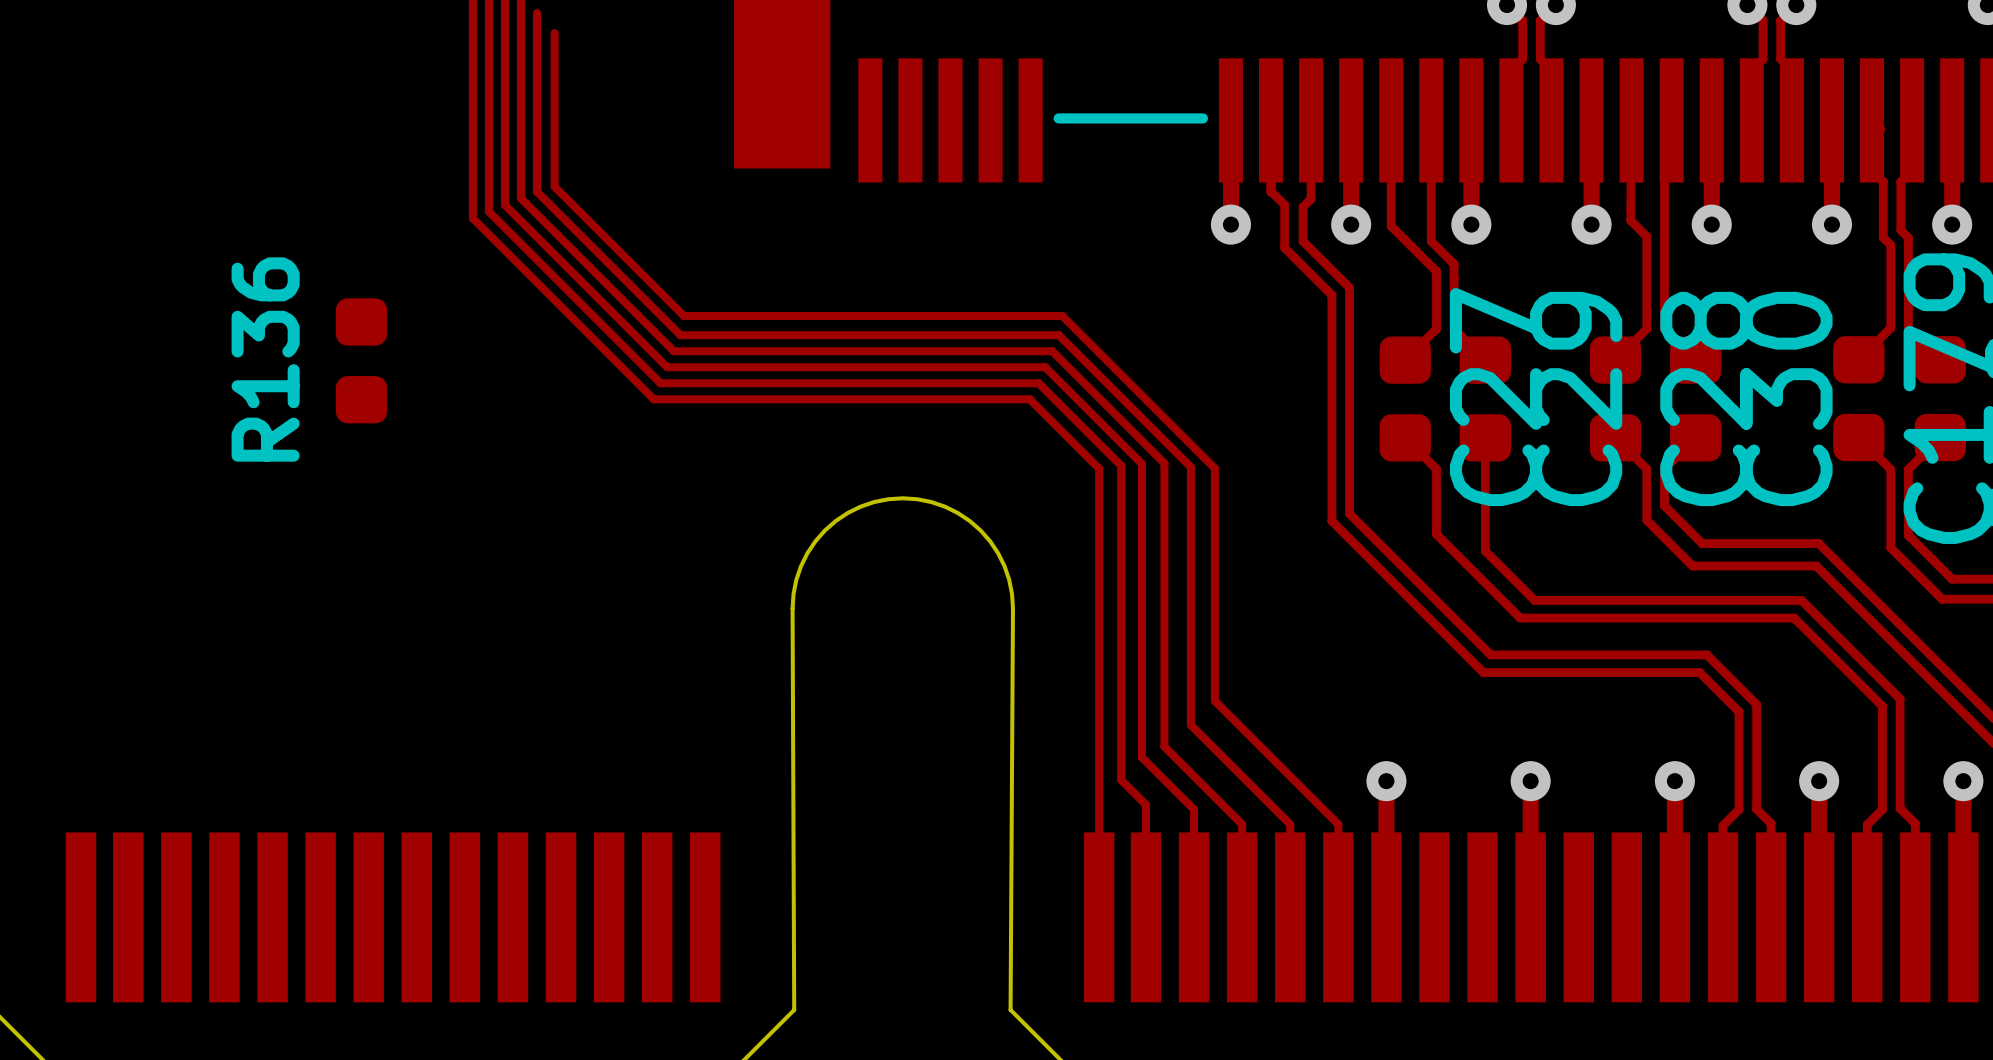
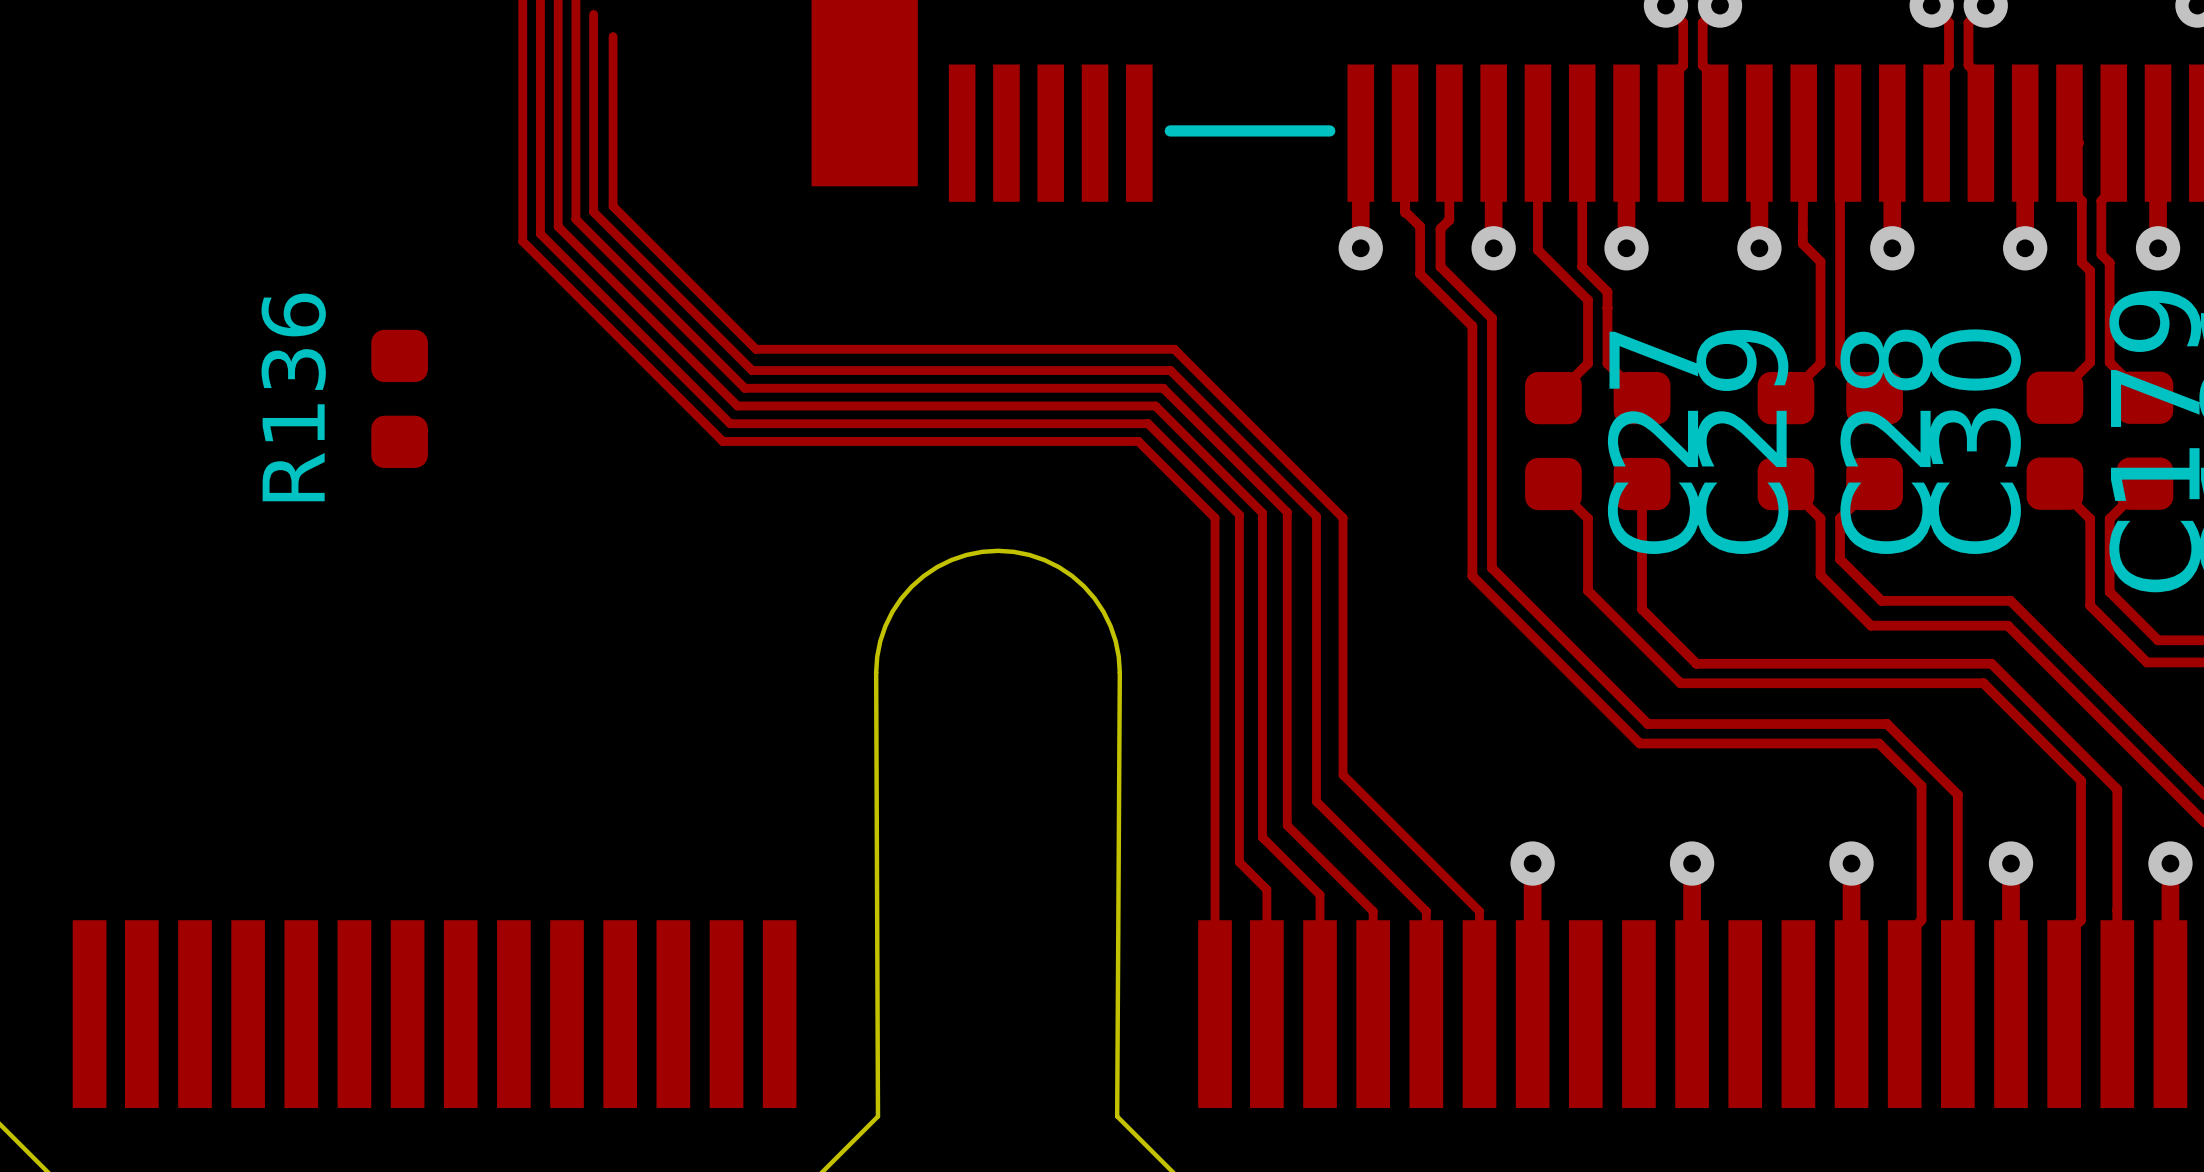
track: (1900, 698) (1900, 808) (1915, 823) -> (2100, 772) (2117, 789) (2117, 910)
track: (1756, 704) (1756, 809) (1771, 823) -> (1941, 778) (1957, 794) (1957, 910)
track: (1739, 711) (1739, 809) (1722, 825) (1722, 847) -> (1921, 786) (1921, 920) (1904, 937)
track: (1882, 809) (1867, 824) (1867, 847) -> (2080, 894) (2080, 920) (2064, 937)

